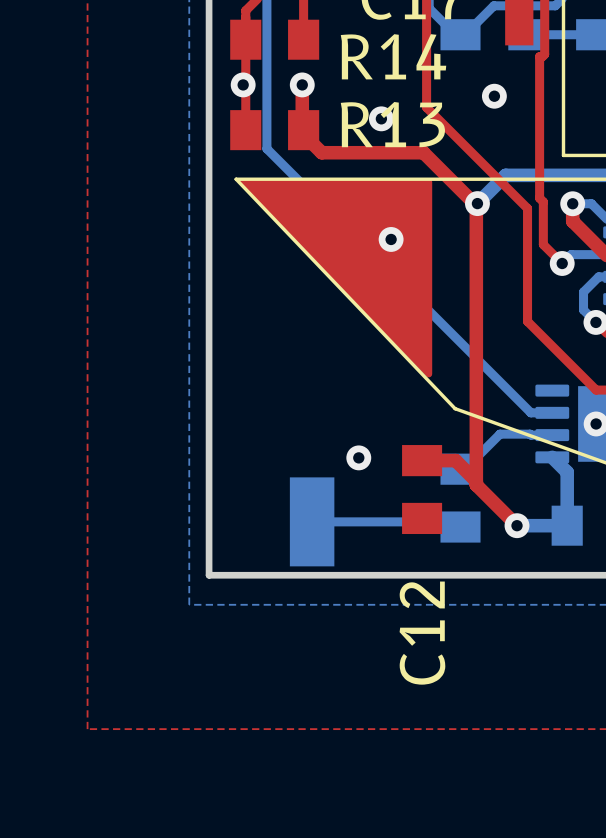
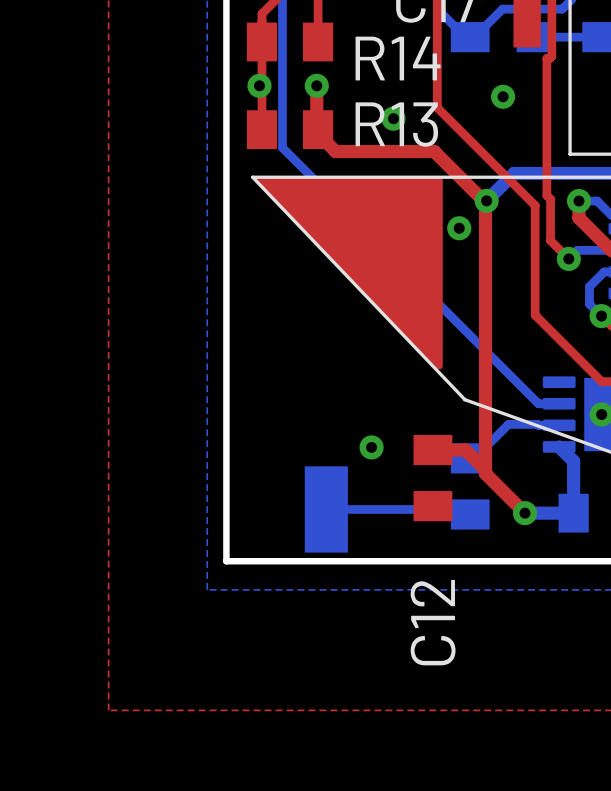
via position: (391, 239) -> (459, 228)

